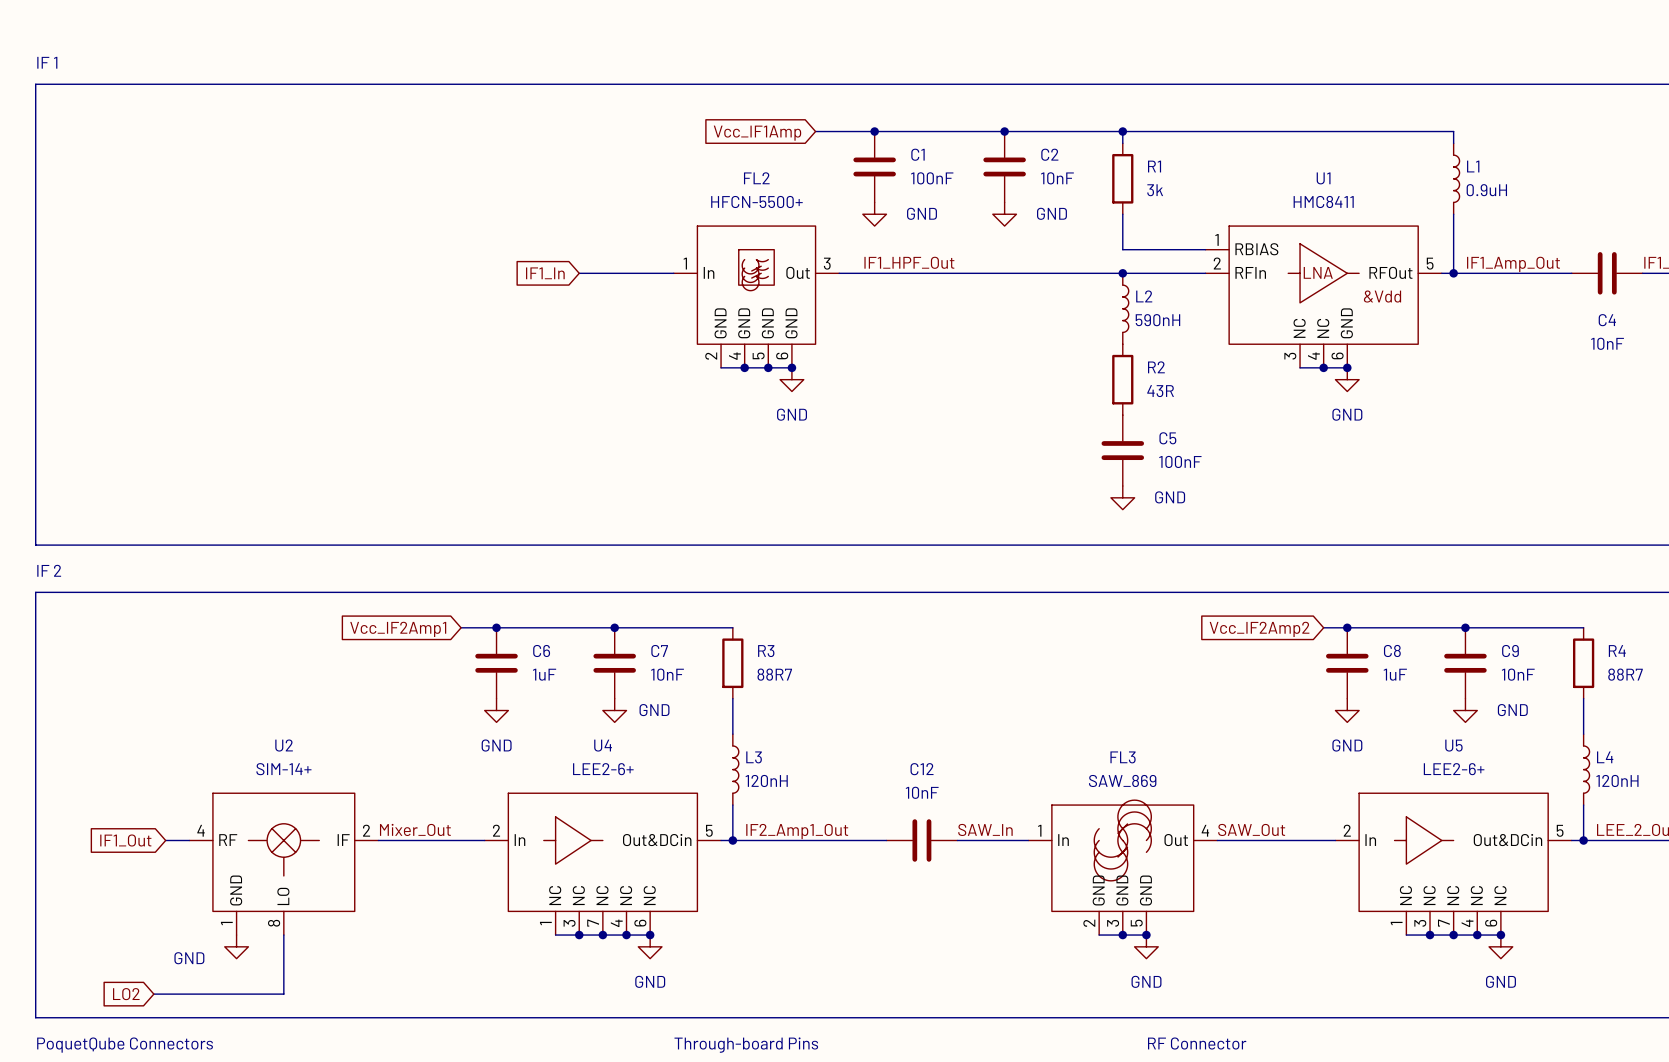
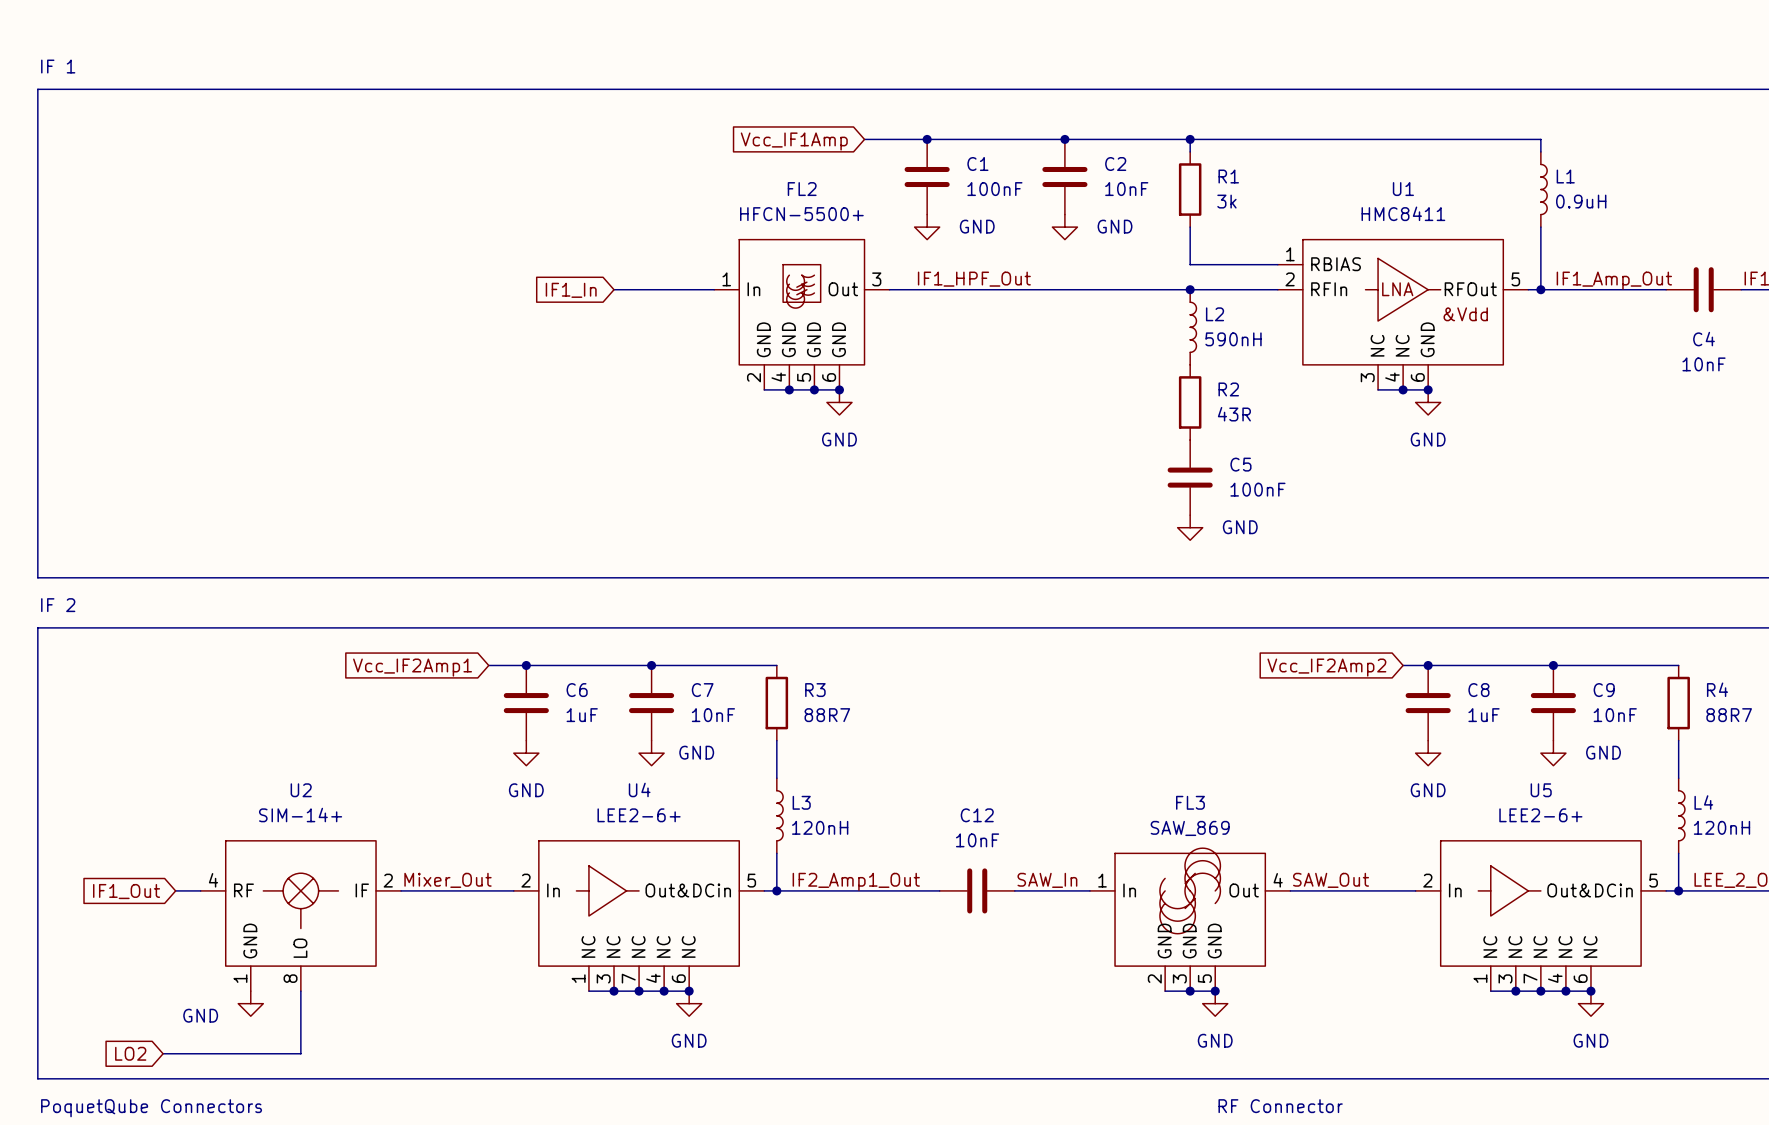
text: Through-board Pins (746, 1045) -> none

